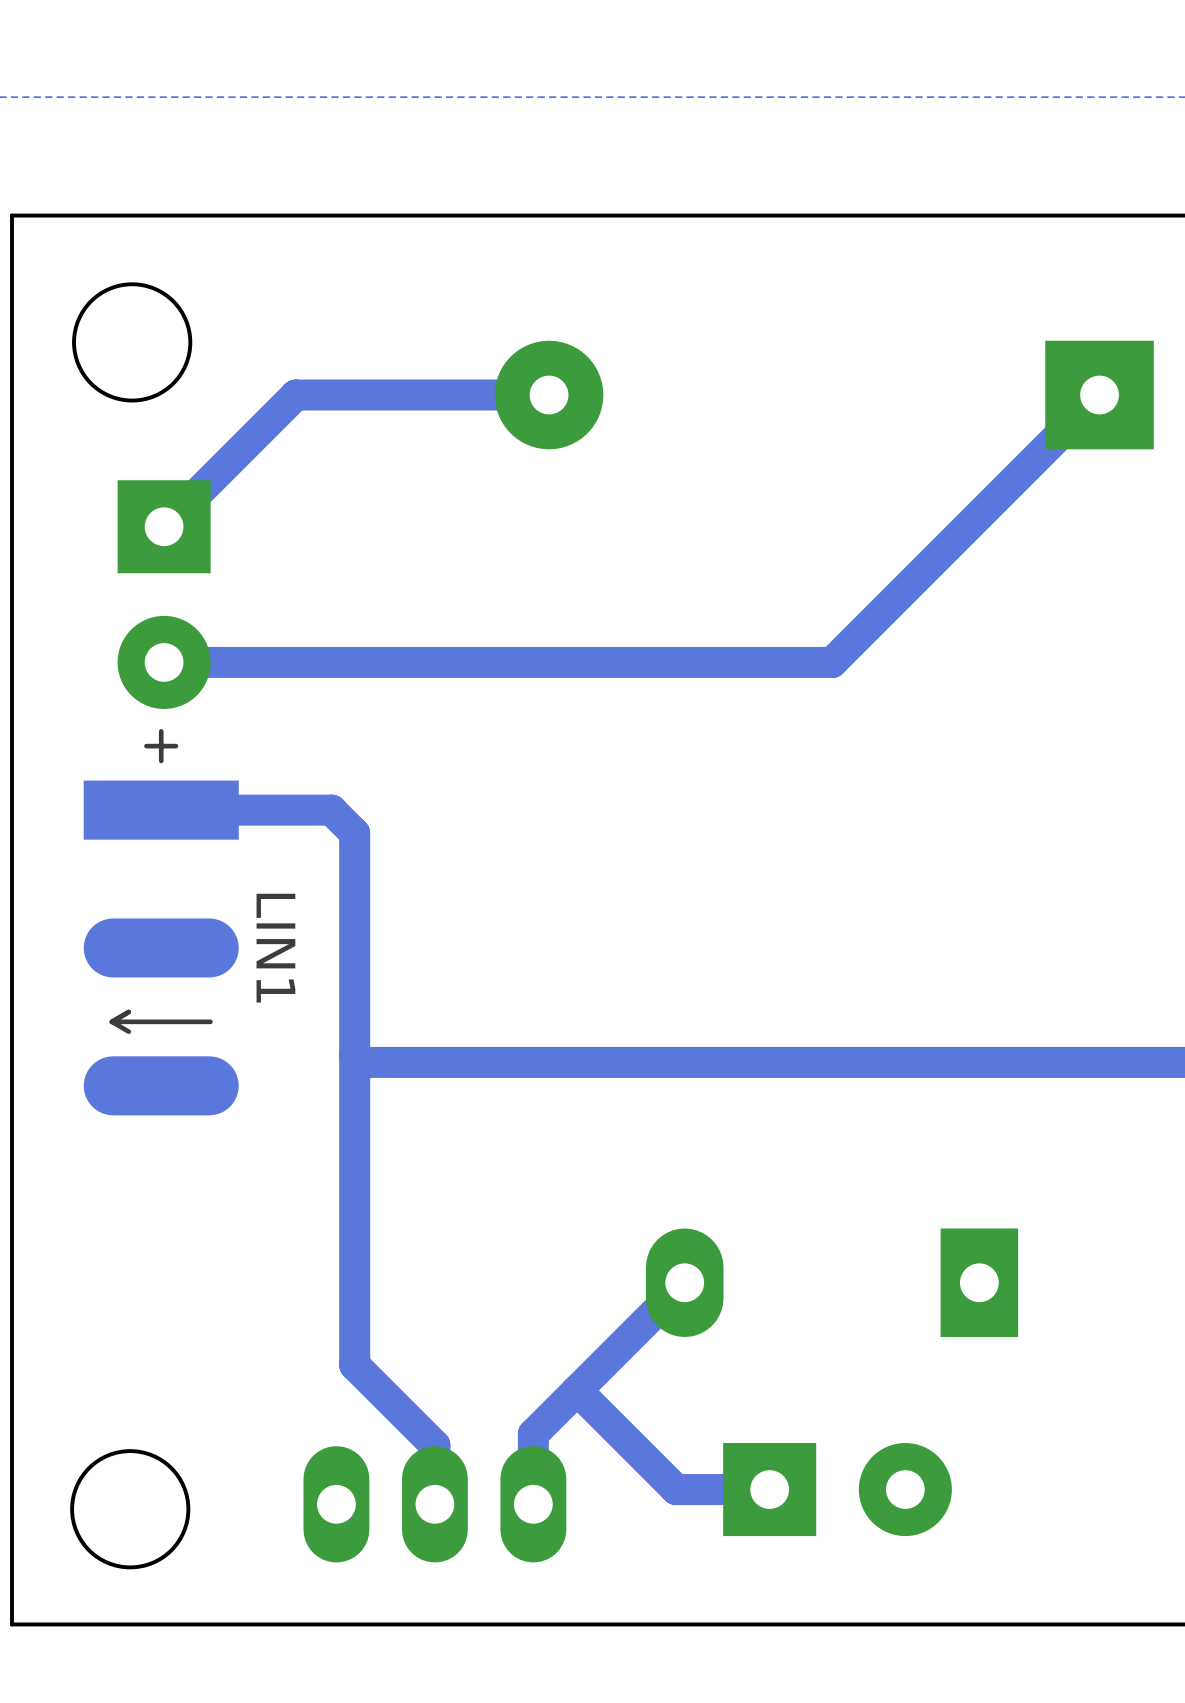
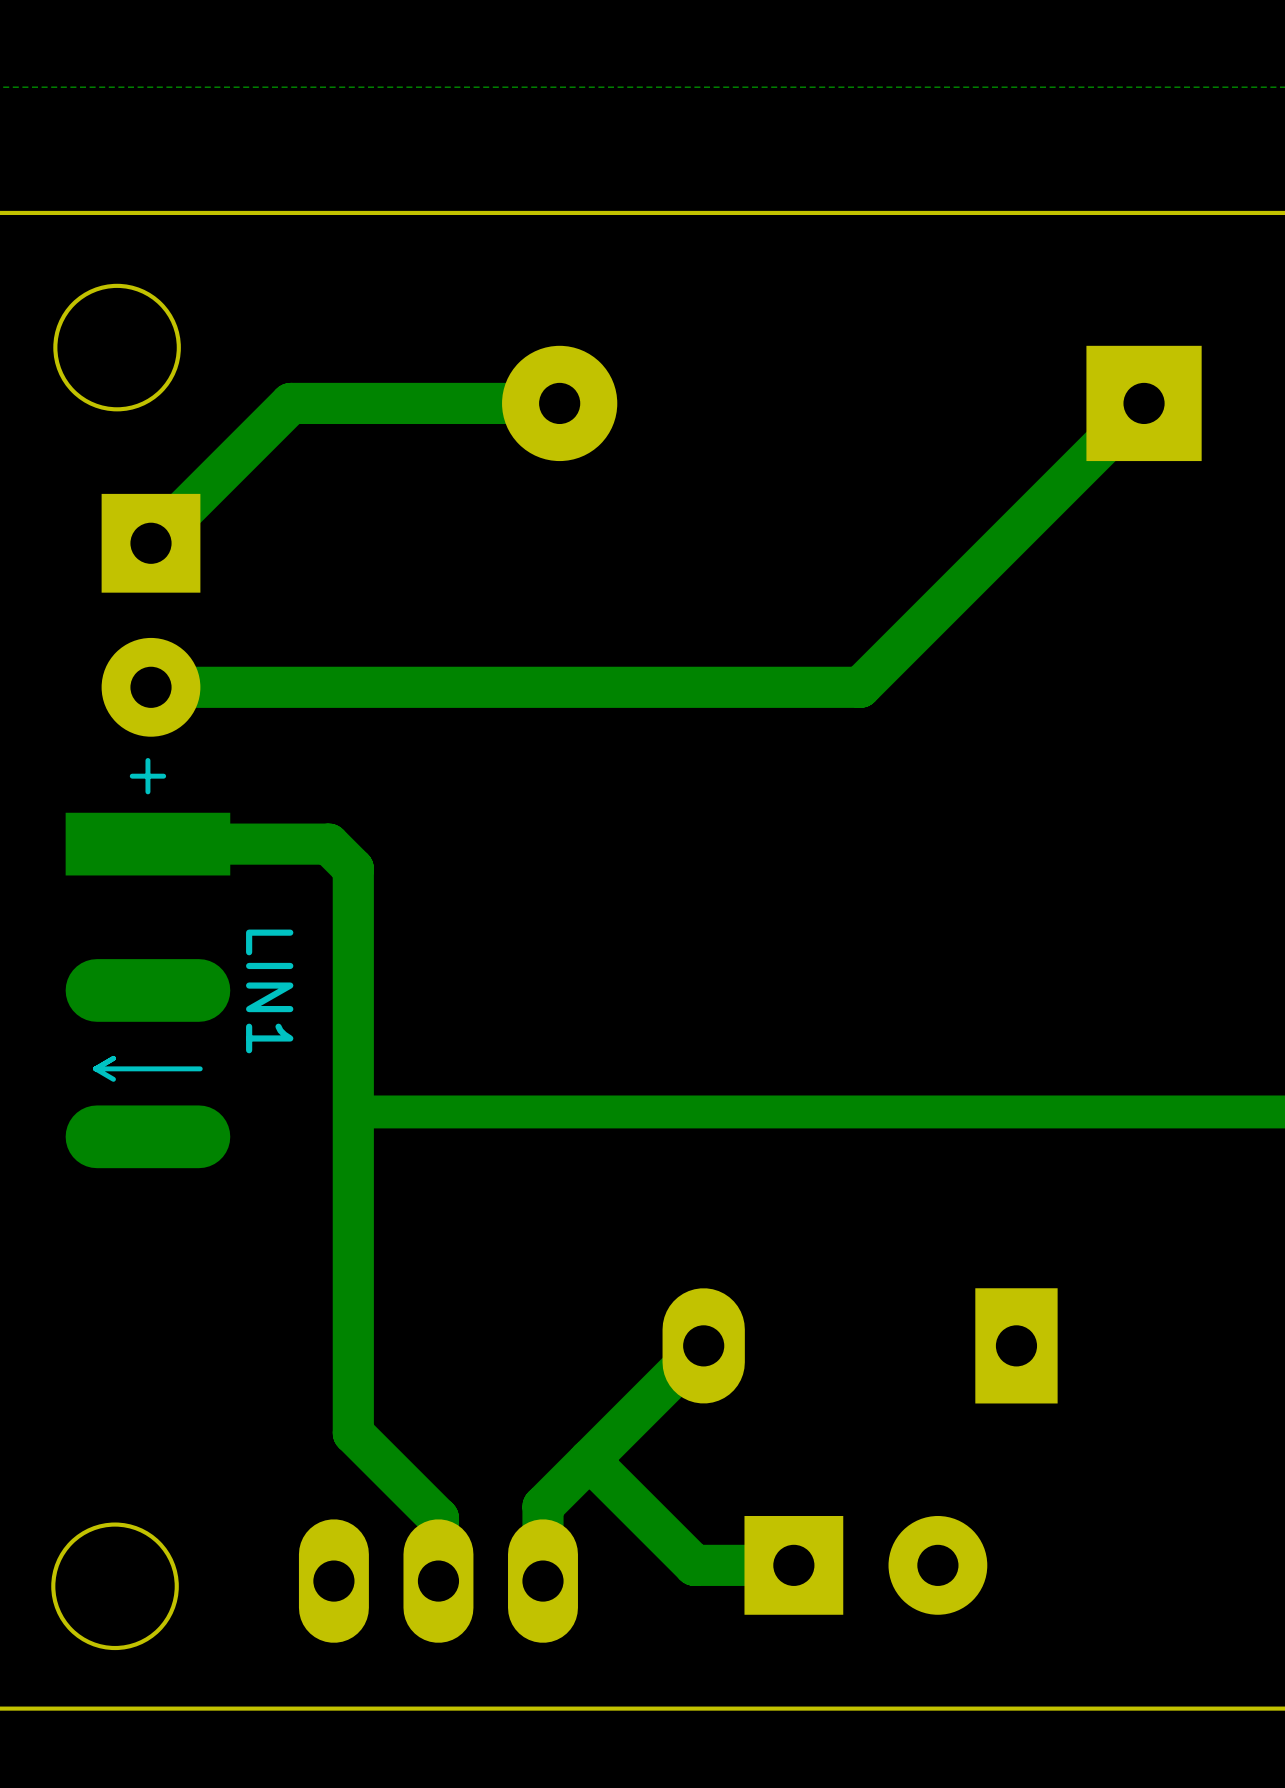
bottom track width: thin (549, 395) (295, 395) (164, 526) -> thick (559, 403) (290, 403) (151, 543)
bottom track width: thin (1099, 395) (832, 662) (164, 662) -> thick (1144, 403) (860, 687) (151, 687)
bottom track width: thin (161, 810) (331, 810) (354, 833) (354, 1365) (434, 1445) (434, 1504) -> thick (147, 844) (328, 844) (353, 868) (353, 1433) (438, 1518) (438, 1581)
bottom track width: thin (684, 1282) (533, 1434) (533, 1504) -> thick (703, 1345) (542, 1506) (542, 1581)
bottom track width: thin (577, 1390) (676, 1489) (769, 1489) -> thick (589, 1460) (694, 1565) (793, 1565)

